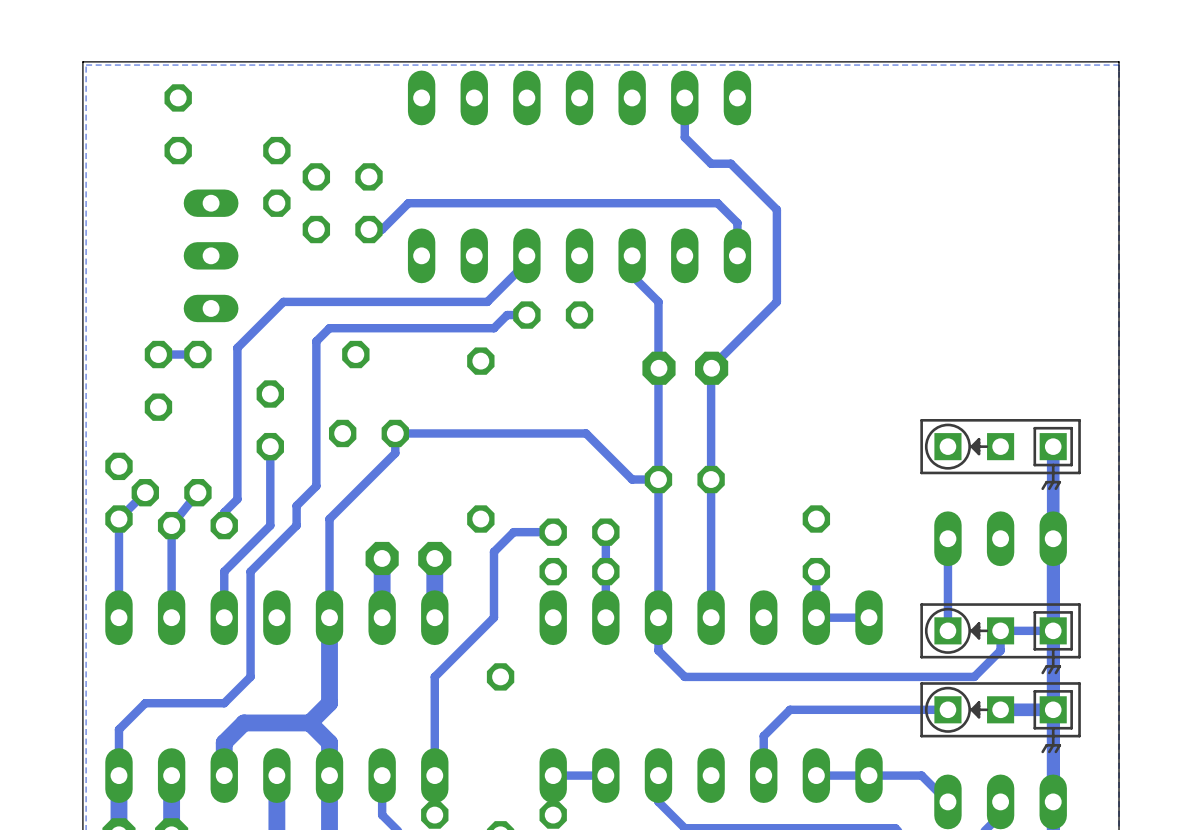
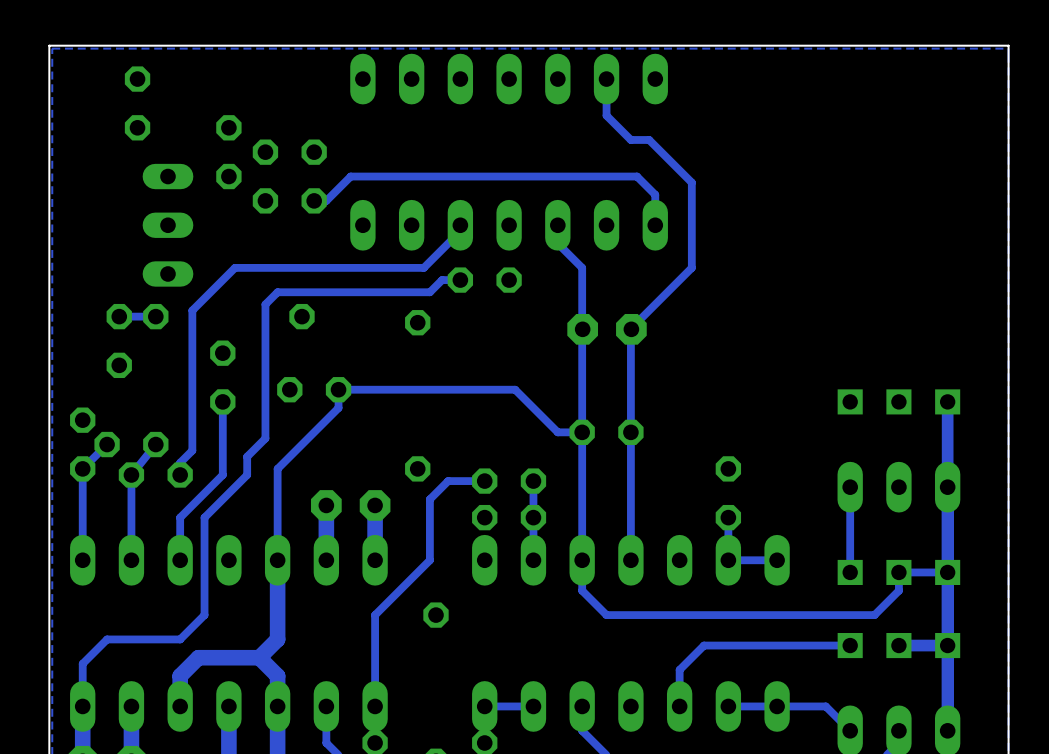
part footprint: [920, 419, 1081, 491] -> [837, 389, 961, 415]
part footprint: [920, 603, 1081, 675] -> [837, 559, 961, 585]
part footprint: [920, 682, 1081, 754] -> [837, 632, 961, 659]

